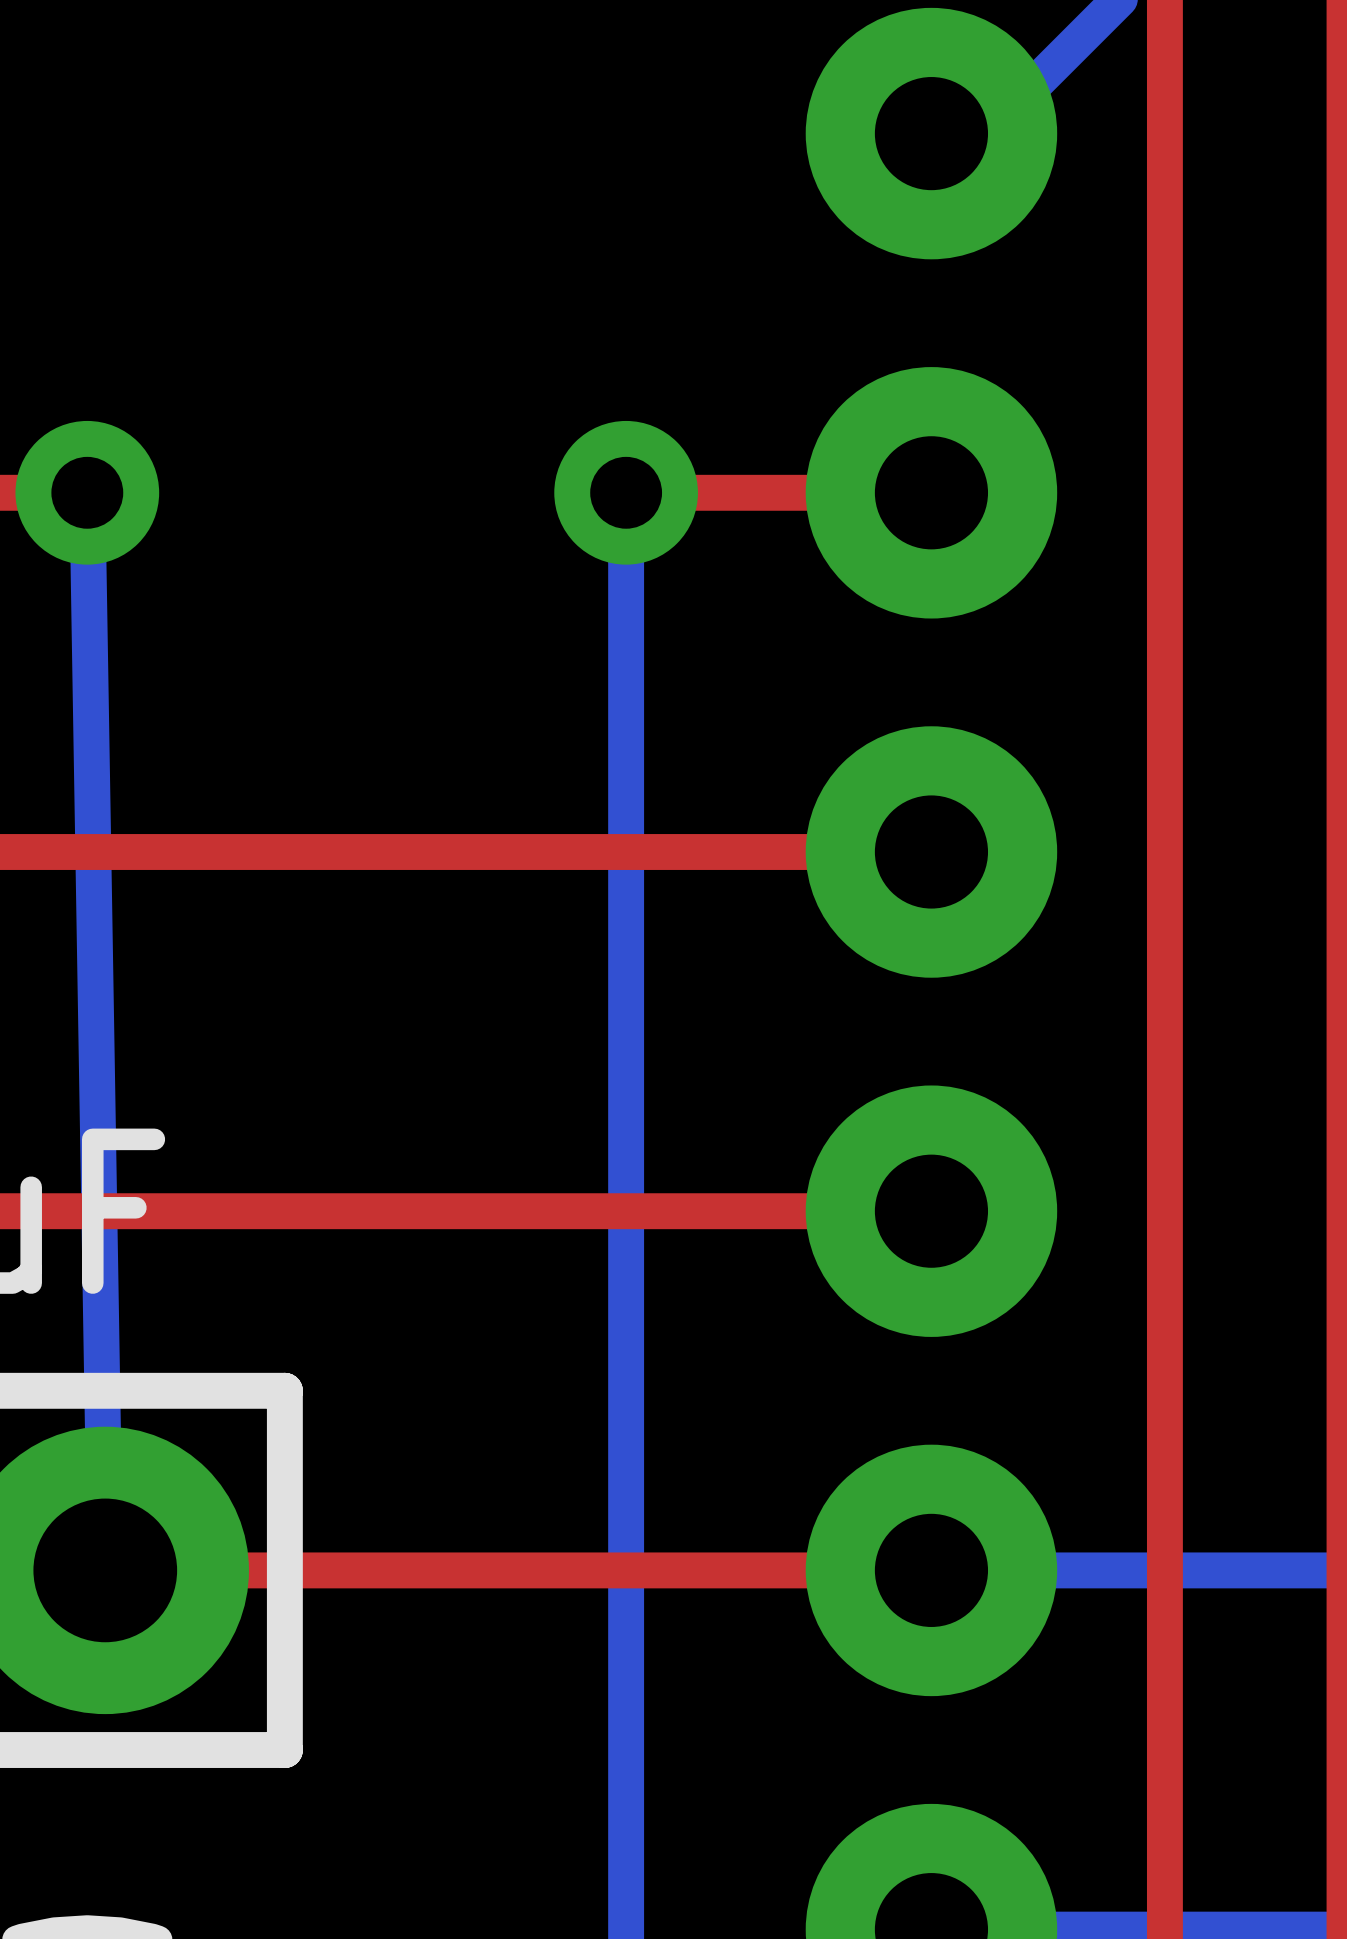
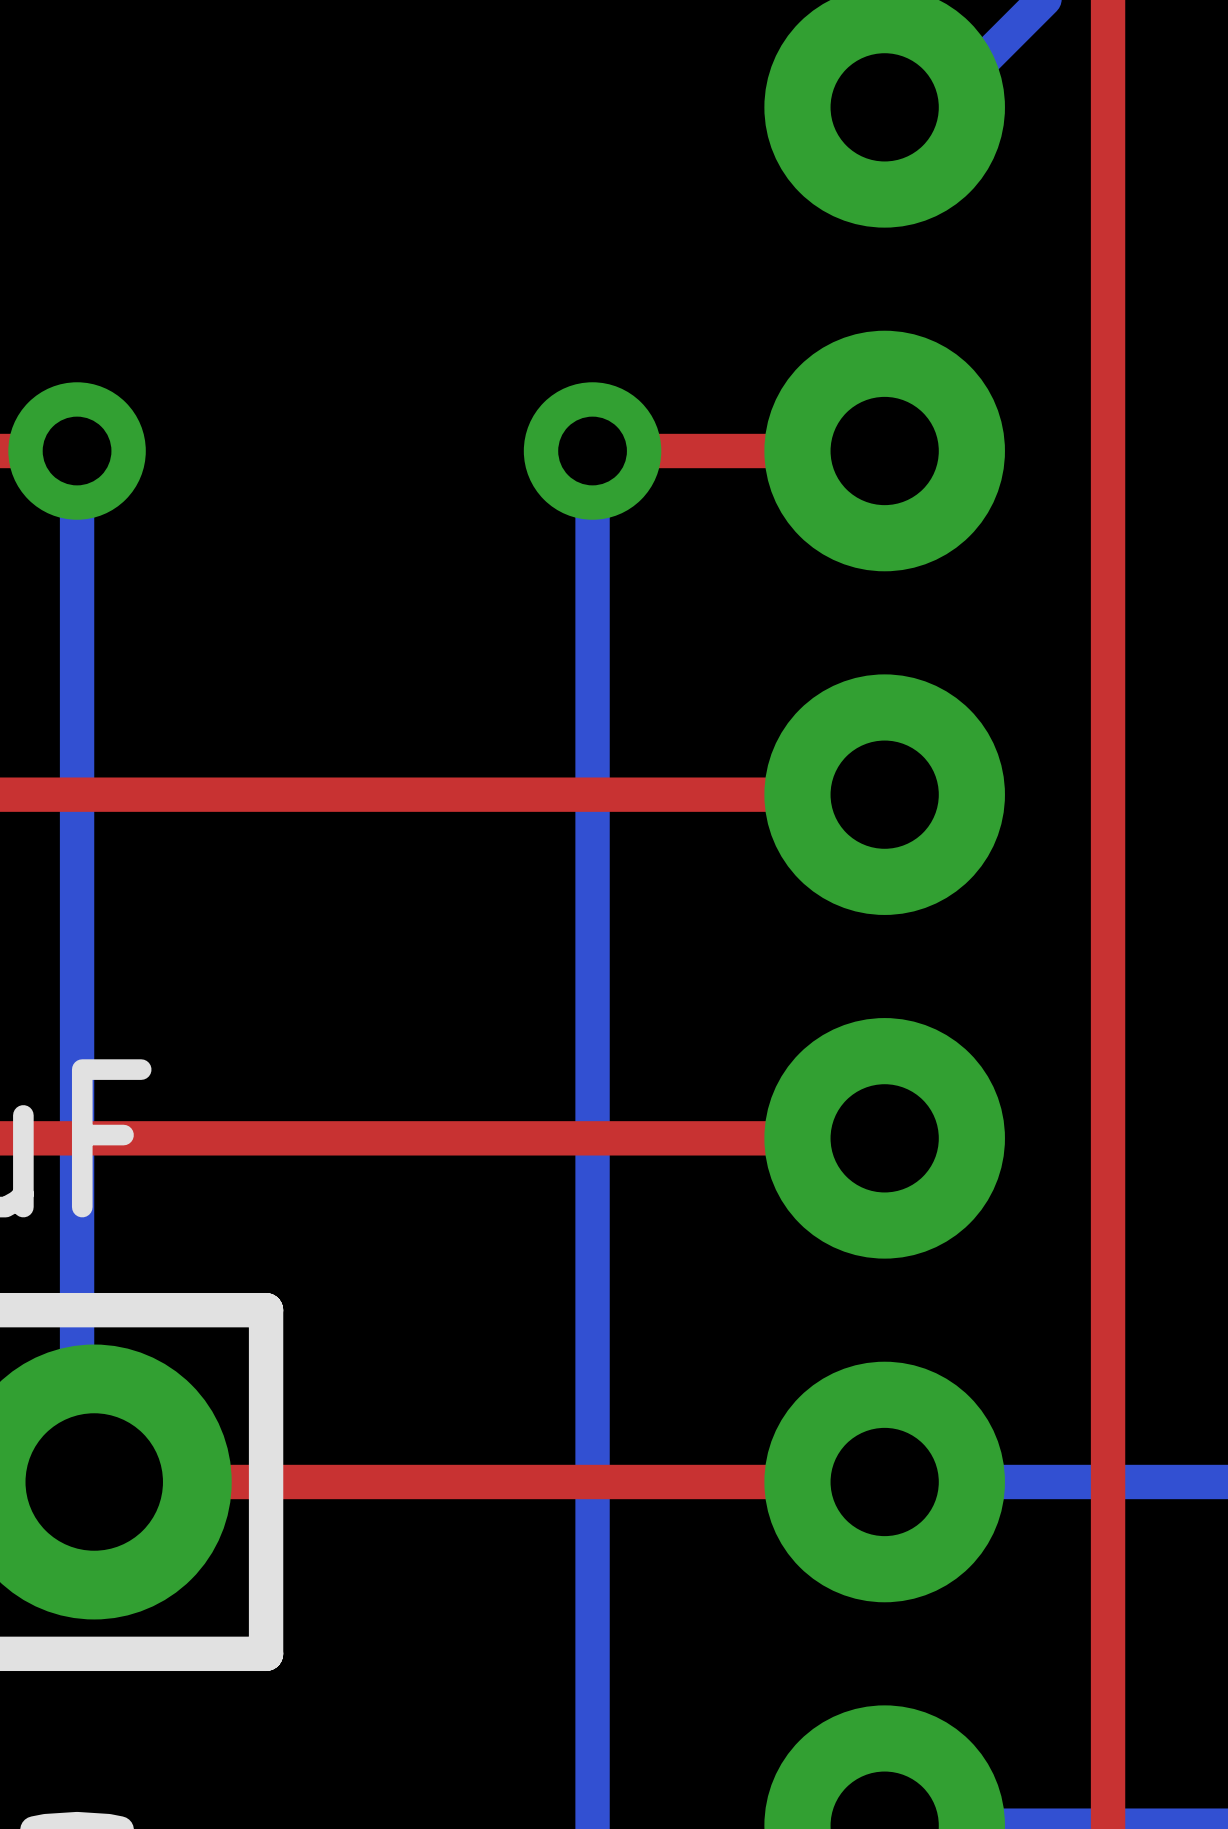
bottom track: (87, 492) (105, 1570) -> (77, 451) (77, 1464) (94, 1482)

